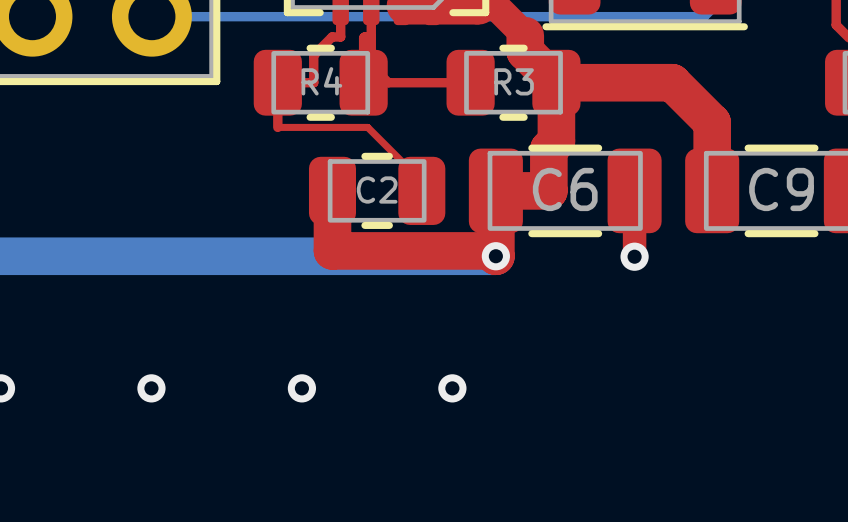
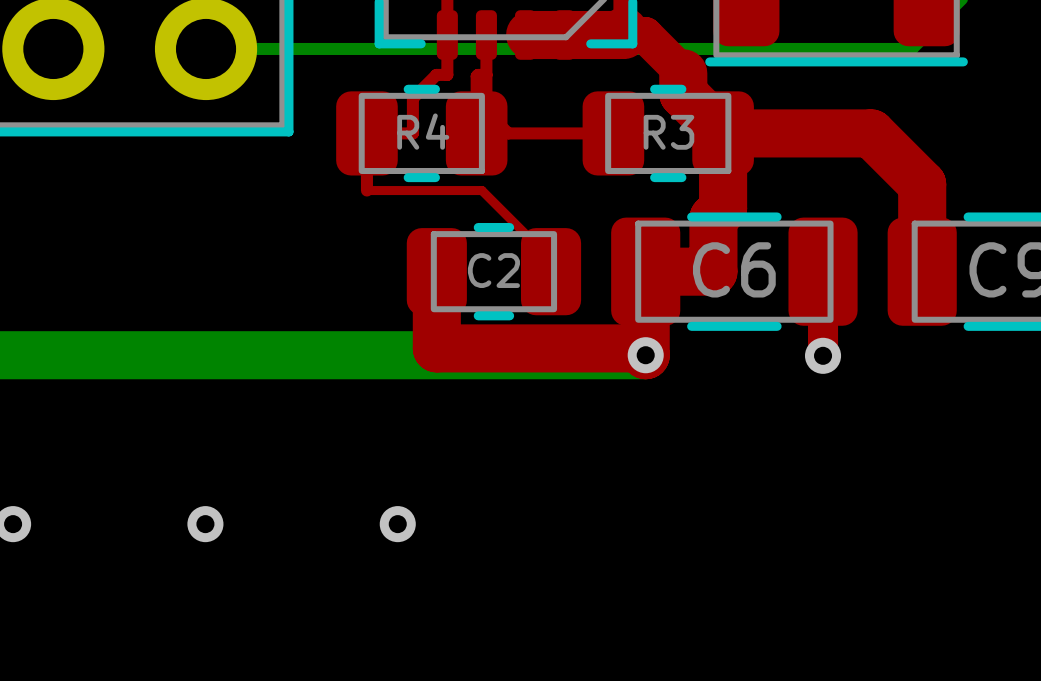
via: (452, 388) -> none

